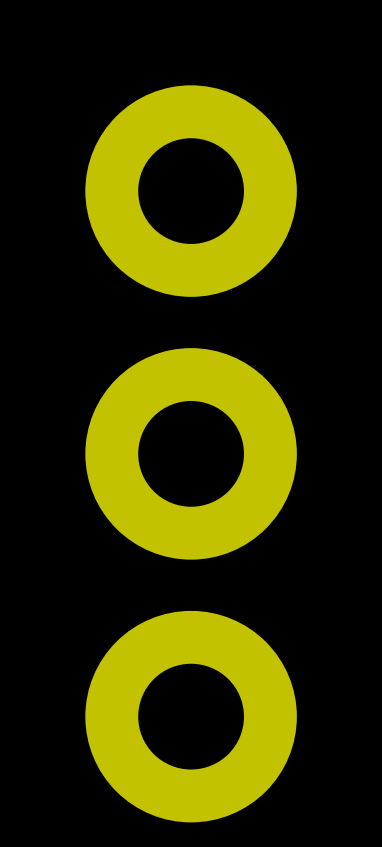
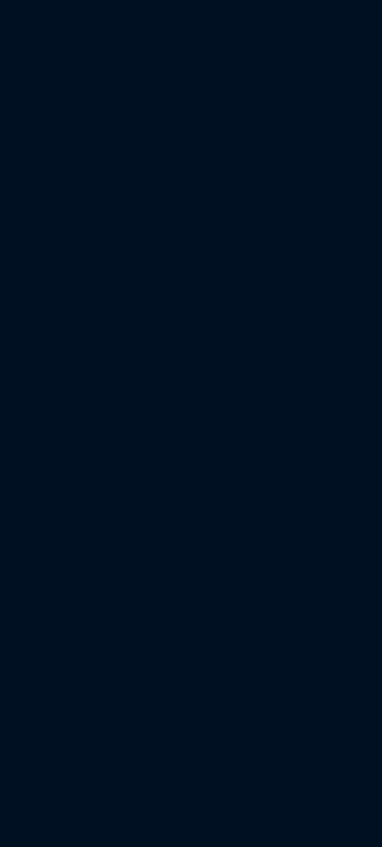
part: (191, 191) -> none
part: (191, 453) -> none
part: (191, 716) -> none

